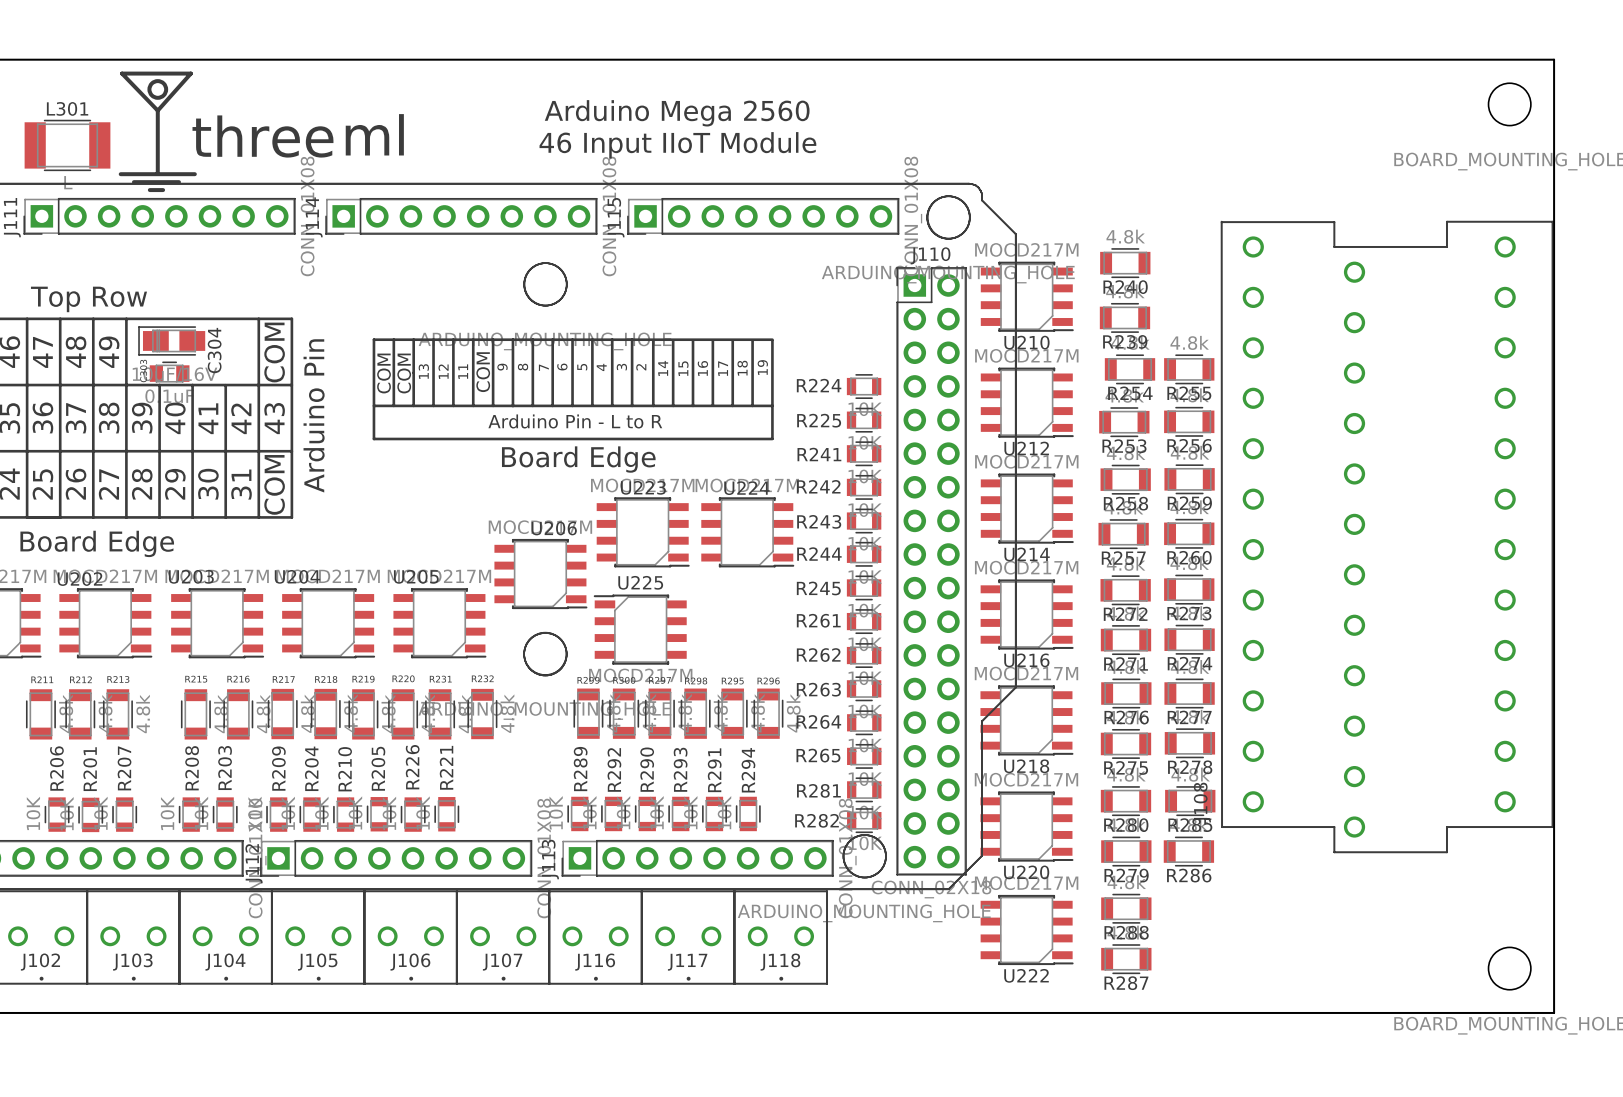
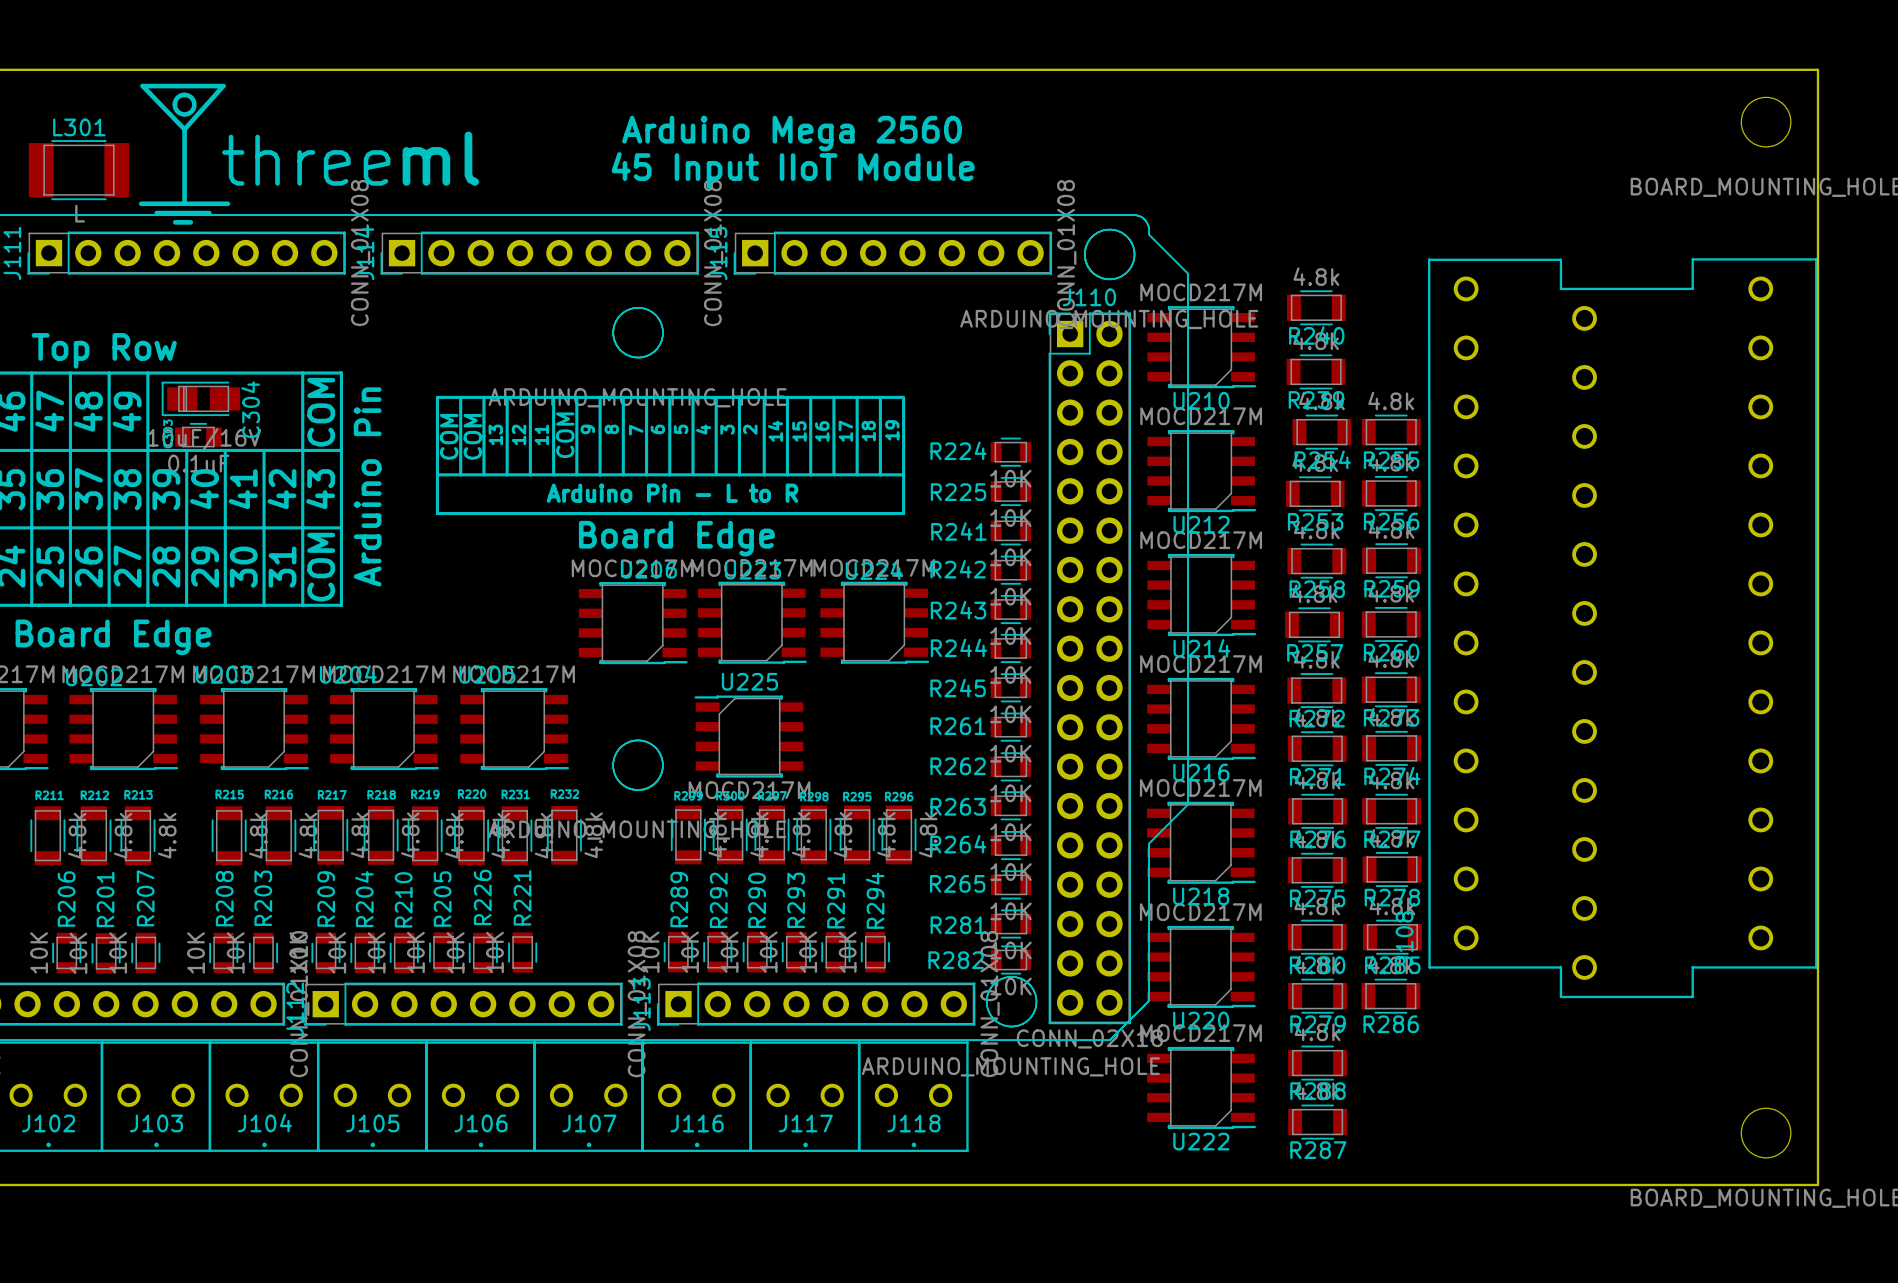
text: 46 Input IIoT Module (677, 145) -> 45 Input IIoT Module (793, 170)
U206 position: (540, 574) -> (633, 623)

